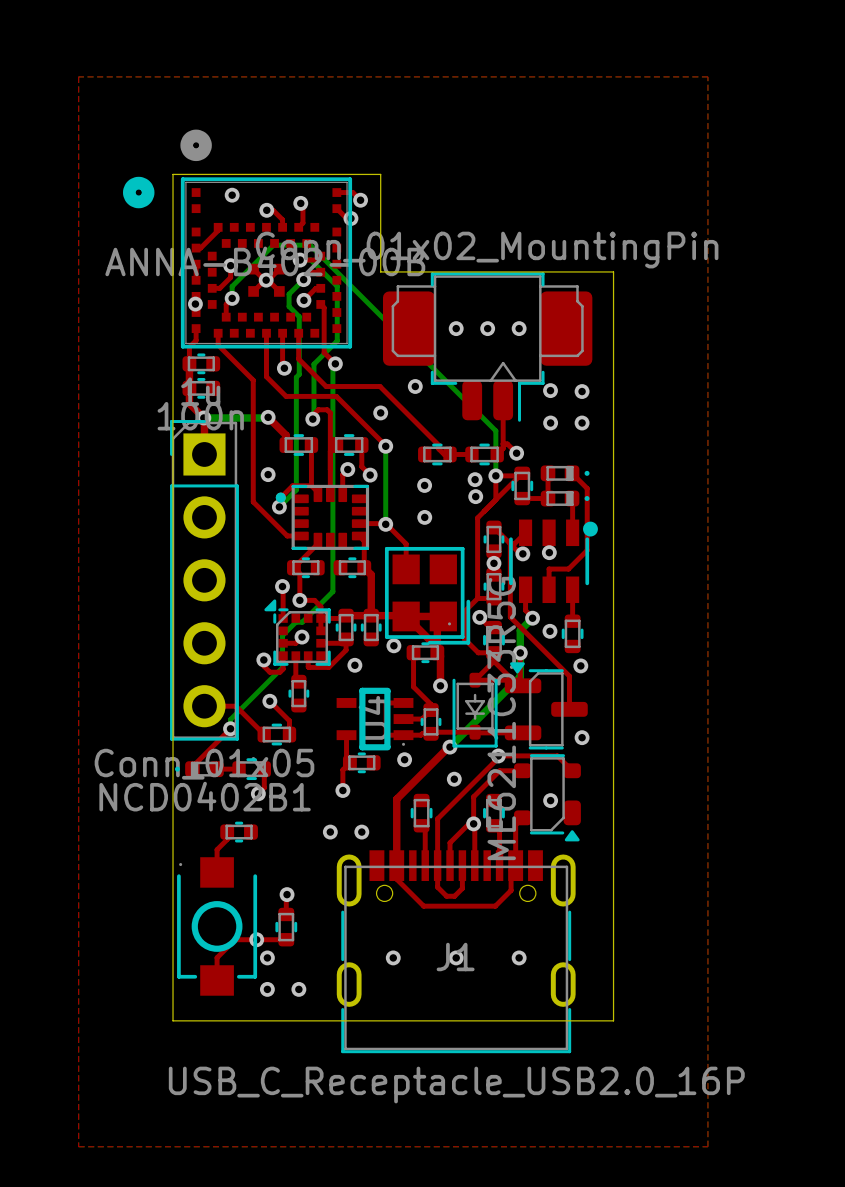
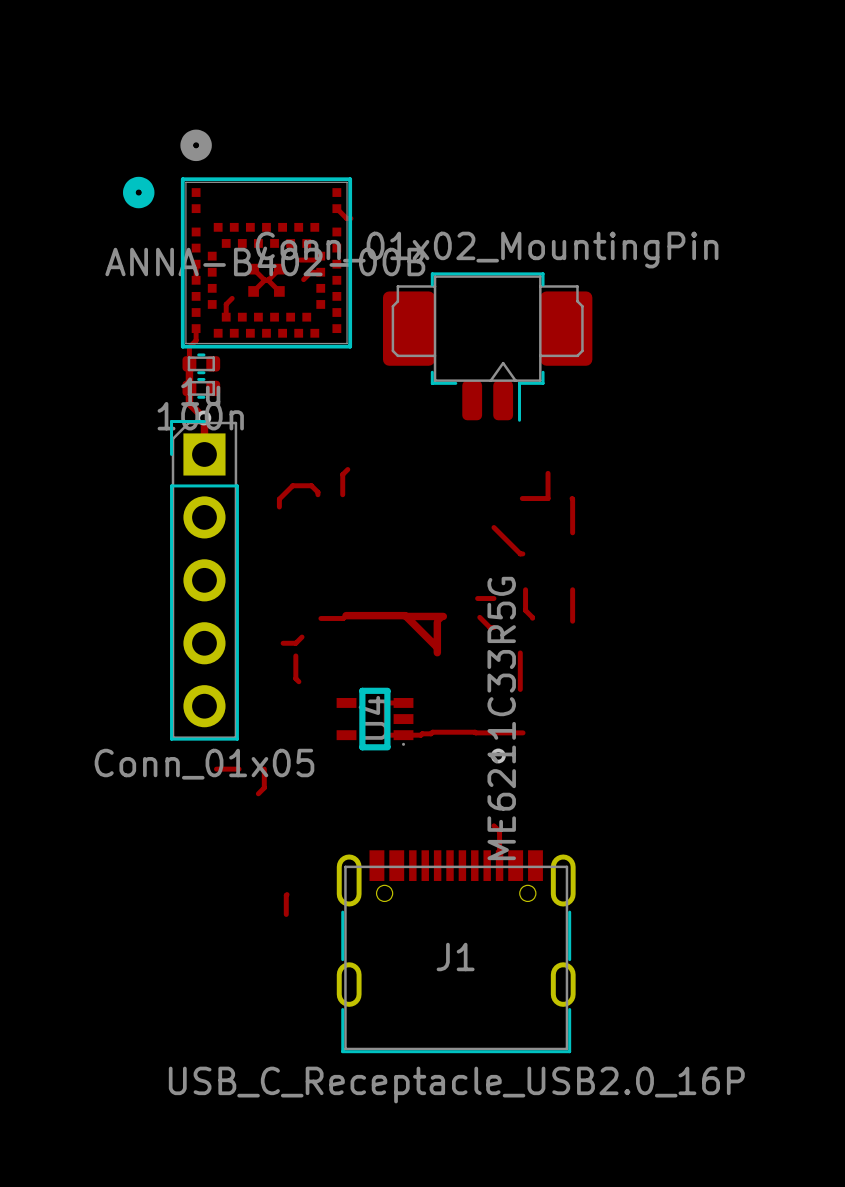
top zone outline: (78, 76) (78, 1146) (707, 1146) (707, 76) (78, 76) -> none
board edge: (173, 174) (173, 1020) (613, 1020) (613, 271) (380, 271) (380, 174) (173, 174) -> none
top track: (336, 192) (352, 192) (360, 200) -> none
via: (232, 195) -> none
via: (360, 200) -> none
top track: (300, 203) (302, 205) (302, 223) (298, 227) -> none
via: (300, 203) -> none
top track: (266, 210) (273, 210) (282, 219) (282, 227) -> none
via: (266, 210) -> none
via: (350, 218) -> none
top track: (218, 227) (218, 230) (200, 248) (196, 248) -> none
bottom track: (300, 260) (310, 260) (337, 286) (337, 340) (313, 364) (312, 419) -> none
via: (300, 260) -> none
top track: (230, 265) (230, 277) (219, 288) (212, 288) -> none
via: (230, 265) -> none
bottom track: (303, 279) (289, 294) (289, 306) (299, 316) (299, 374) (296, 377) (296, 490) (279, 506) -> none
via: (303, 279) -> none
via: (266, 280) -> none
top track: (320, 288) (315, 288) (303, 300) -> none
bottom track: (232, 298) (232, 286) (273, 245) (310, 245) (495, 430) (495, 475) -> none
via: (232, 298) -> none
via: (303, 300) -> none
via: (195, 304) -> none
top track: (320, 304) (324, 307) (324, 352) (335, 363) -> none
via: (456, 328) -> none
via: (487, 328) -> none
via: (519, 328) -> none
top track: (218, 333) (218, 345) (253, 380) (253, 501) (287, 535) (301, 535) -> none
top track: (266, 333) (266, 376) (286, 396) (336, 396) (385, 445) -> none
top track: (282, 333) (282, 366) -> none
top track: (298, 333) (298, 359) (326, 386) (380, 386) (438, 445) (438, 449) (444, 454) (471, 454) -> none
bottom track: (335, 363) (332, 366) (332, 591) (302, 622) (295, 622) (282, 635) (282, 667) (230, 719) (230, 728) -> none
via: (335, 363) -> none
via: (284, 368) -> none
via: (415, 386) -> none
via: (550, 390) -> none
via: (582, 391) -> none
top track: (503, 400) (503, 448) (497, 454) -> none
via: (380, 412) -> none
top track: (268, 417) (286, 435) (286, 445) -> none
bottom track: (268, 417) (203, 417) -> none
via: (268, 417) -> none
top track: (312, 419) (312, 415) (318, 409) (327, 409) (330, 412) (330, 494) -> none
via: (312, 419) -> none
via: (550, 423) -> none
via: (582, 423) -> none
top track: (503, 443) (507, 443) (516, 453) -> none
part: (298, 445) -> none
top track: (311, 445) (311, 485) -> none
part: (349, 445) -> none
top track: (361, 445) (361, 466) (370, 475) -> none
bottom track: (385, 446) (385, 524) -> none
via: (385, 446) -> none
via: (516, 453) -> none
part: (437, 454) -> none
part: (484, 454) -> none
via: (347, 469) -> none
top track: (522, 473) (477, 517) (477, 598) (464, 611) (464, 638) (478, 652) (493, 652) (493, 661) -> none
part: (565, 473) -> none
top track: (572, 473) (587, 488) (587, 550) (568, 569) (549, 569) (549, 589) -> none
via: (268, 474) -> none
via: (370, 475) -> none
via: (495, 475) -> none
top track: (519, 475) (495, 475) (495, 499) -> none
via: (475, 479) -> none
via: (424, 485) -> none
part: (522, 485) -> none
via: (475, 496) -> none
part: (565, 498) -> none
via: (279, 506) -> none
part: (322, 517) -> none
via: (424, 517) -> none
top track: (359, 523) (385, 523) (406, 543) (406, 569) -> none
via: (385, 524) -> none
top track: (525, 532) (514, 543) (510, 543) (510, 617) (569, 676) (569, 709) -> none
top track: (359, 535) (364, 541) (364, 567) (371, 574) (371, 615) -> none
part: (493, 539) -> none
top track: (317, 540) (317, 543) (293, 567) (299, 573) (299, 600) (314, 600) (320, 606) (320, 630) -> none
via: (549, 552) -> none
via: (522, 553) -> none
part: (553, 561) -> none
via: (493, 563) -> none
part: (305, 567) -> none
part: (352, 567) -> none
top track: (282, 586) (283, 618) -> none
via: (282, 586) -> none
part: (493, 586) -> none
part: (427, 595) -> none
via: (299, 600) -> none
via: (479, 617) -> none
bottom track: (532, 618) (520, 630) (520, 676) (449, 747) -> none
via: (532, 618) -> none
part: (346, 627) -> none
part: (371, 627) -> none
via: (549, 631) -> none
part: (297, 632) -> none
part: (572, 633) -> none
via: (302, 637) -> none
part: (493, 640) -> none
top track: (320, 643) (342, 643) (346, 639) (346, 650) (328, 667) (308, 667) (308, 655) -> none
via: (393, 645) -> none
top track: (413, 652) (413, 686) (431, 704) (431, 710) (422, 719) (403, 719) -> none
part: (425, 652) -> none
top track: (437, 652) (440, 655) (440, 685) -> none
via: (520, 652) -> none
top track: (283, 655) (283, 669) (279, 672) (269, 672) (263, 666) (263, 659) -> none
via: (263, 659) -> none
top track: (493, 661) (518, 685) (523, 685) (517, 680) (475, 680) (493, 661) -> none
via: (354, 665) -> none
via: (580, 665) -> none
via: (440, 685) -> none
part: (298, 693) -> none
top track: (269, 701) (289, 720) (289, 734) -> none
via: (269, 701) -> none
part: (546, 705) -> none
top track: (204, 706) (235, 706) (264, 734) -> none
part: (475, 710) -> none
part: (431, 721) -> none
top track: (230, 728) (192, 766) (192, 769) -> none
via: (230, 728) -> none
part: (276, 734) -> none
top track: (346, 735) (346, 759) (349, 762) (342, 769) (342, 790) -> none
via: (582, 737) -> none
via: (449, 747) -> none
top track: (450, 747) (396, 799) (396, 879) (423, 906) (495, 906) (511, 890) (511, 870) (515, 865) (515, 824) (522, 817) -> none
via: (404, 759) -> none
part: (361, 762) -> none
part: NCD0402B1 (199, 769) -> none
part: (251, 769) -> none
top track: (522, 770) (499, 770) (473, 796) (473, 823) -> none
top track: (572, 770) (557, 755) (500, 755) (437, 818) (437, 887) (446, 896) (454, 896) (462, 888) (462, 865) -> none
via: (454, 779) -> none
via: (342, 790) -> none
via: (258, 793) -> none
part: (547, 797) -> none
via: (550, 800) -> none
part: (421, 813) -> none
part: (493, 813) -> none
top track: (473, 823) (474, 865) -> none
top track: (473, 823) (468, 823) (450, 842) (450, 865) -> none
via: (473, 823) -> none
top track: (421, 825) (425, 829) (425, 865) -> none
top track: (227, 832) (227, 839) (217, 849) (217, 872) -> none
part: (239, 832) -> none
via: (330, 832) -> none
via: (361, 832) -> none
via: (287, 894) -> none
part: (217, 926) -> none
part: (286, 927) -> none
via: (256, 939) -> none
top track: (286, 939) (235, 939) (217, 957) (217, 980) -> none
via: (267, 957) -> none
via: (393, 957) -> none
via: (456, 957) -> none
via: (519, 957) -> none
via: (267, 989) -> none
via: (298, 989) -> none

